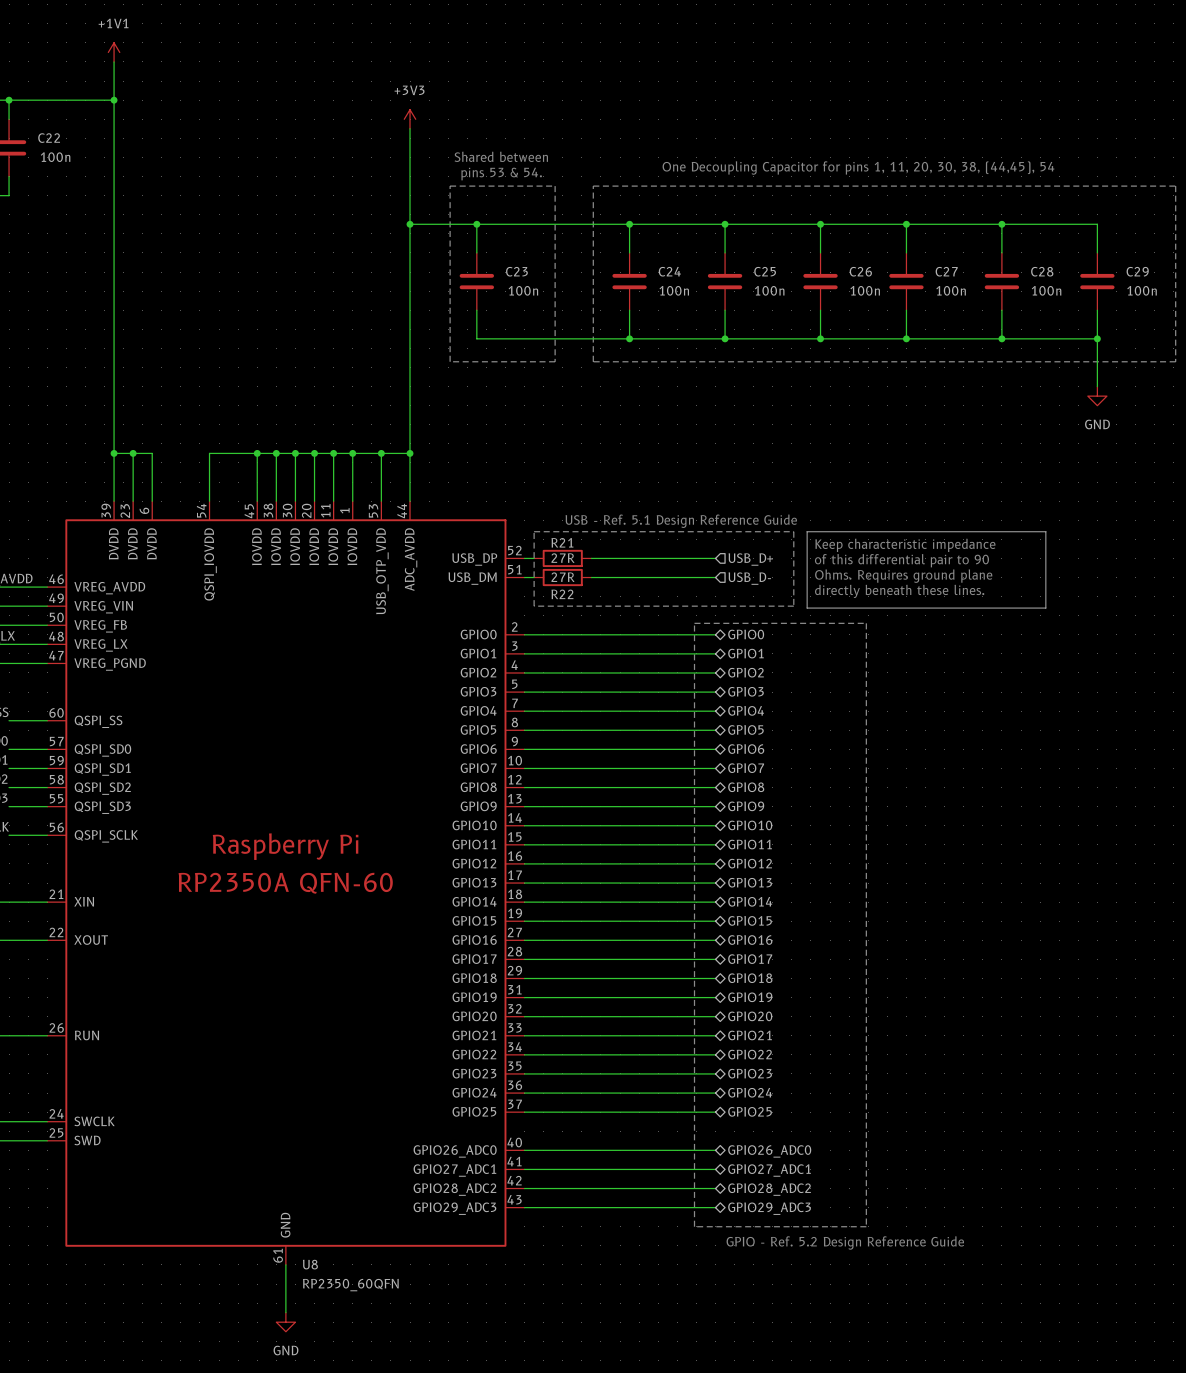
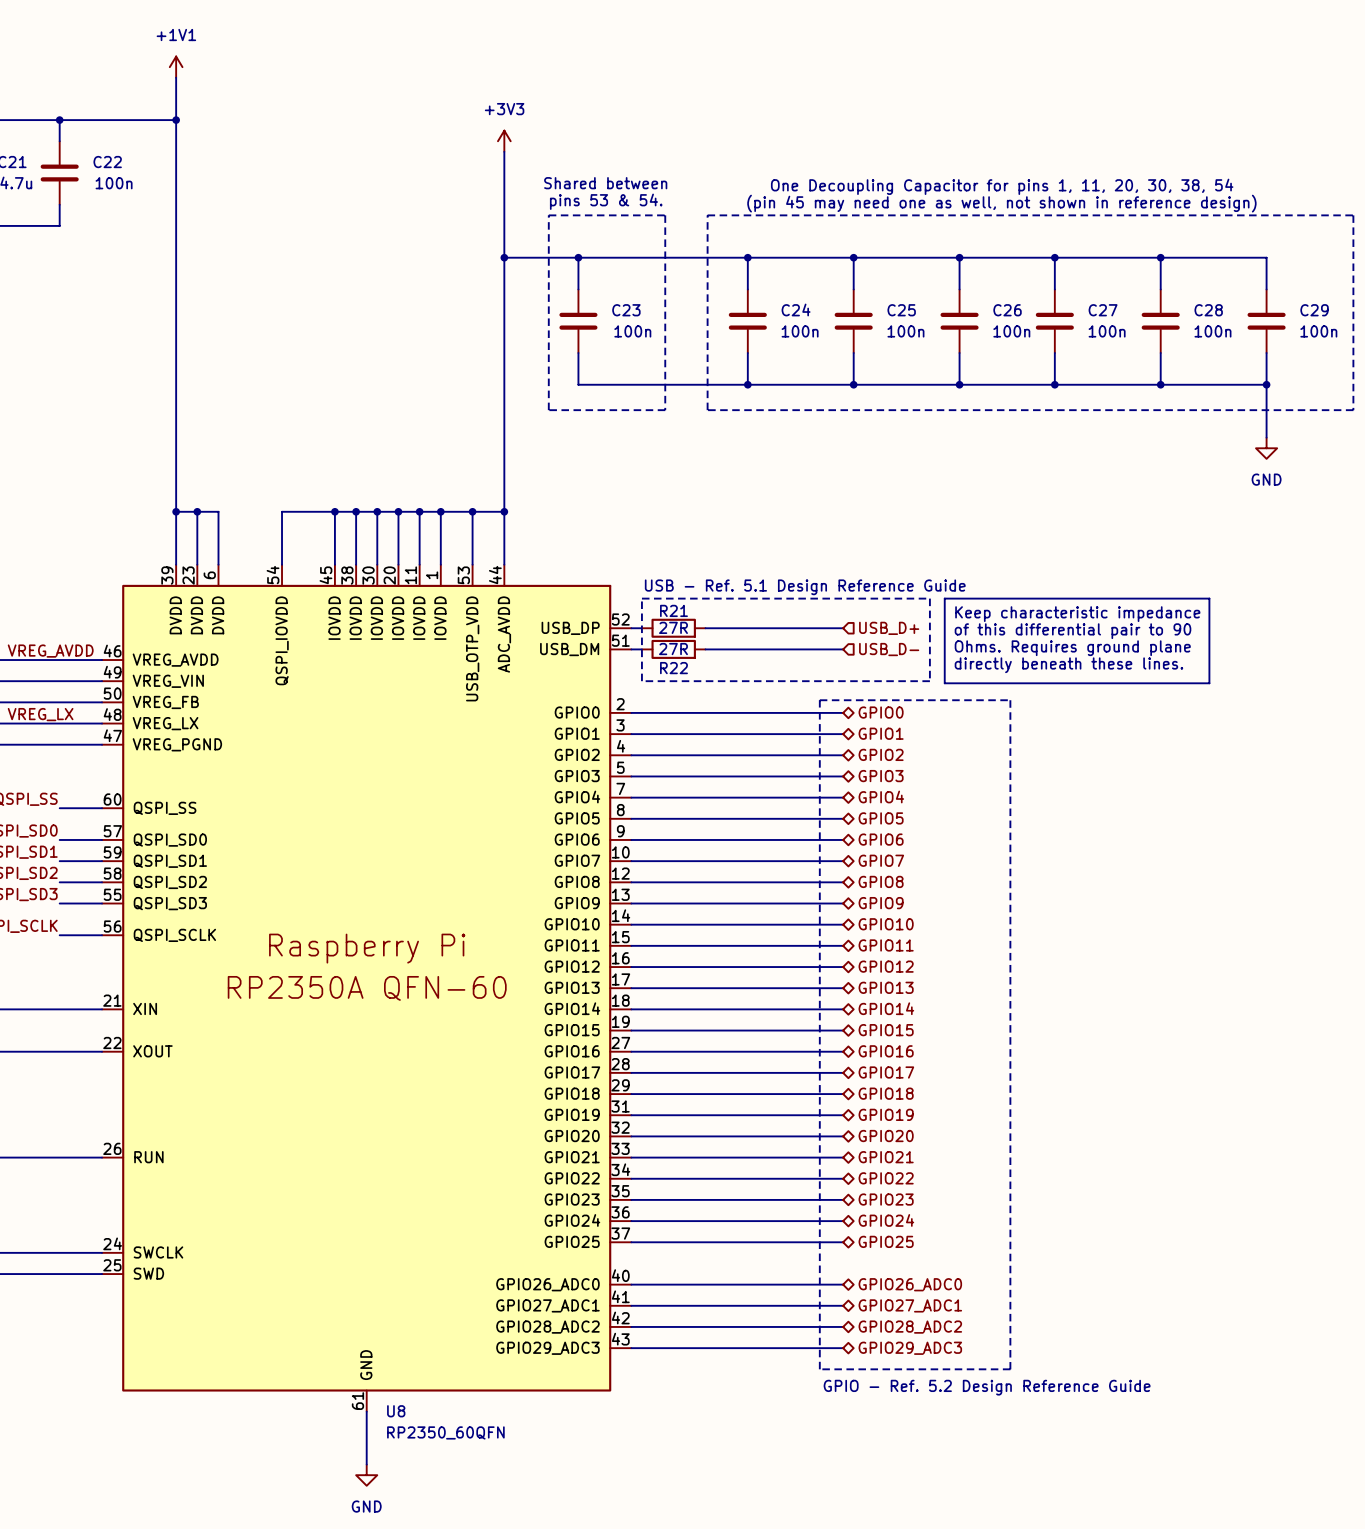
text: One Decoupling Capacitor for pins 1, 11, 20, 30, 38, (44,45), 54 (858, 167) -> One Decoupling Capacitor for pins 1, 11, 20, 30, 38, 54 (1002, 186)
text: none -> (pin 45 may need one as well, not shown in reference design) (1001, 203)

